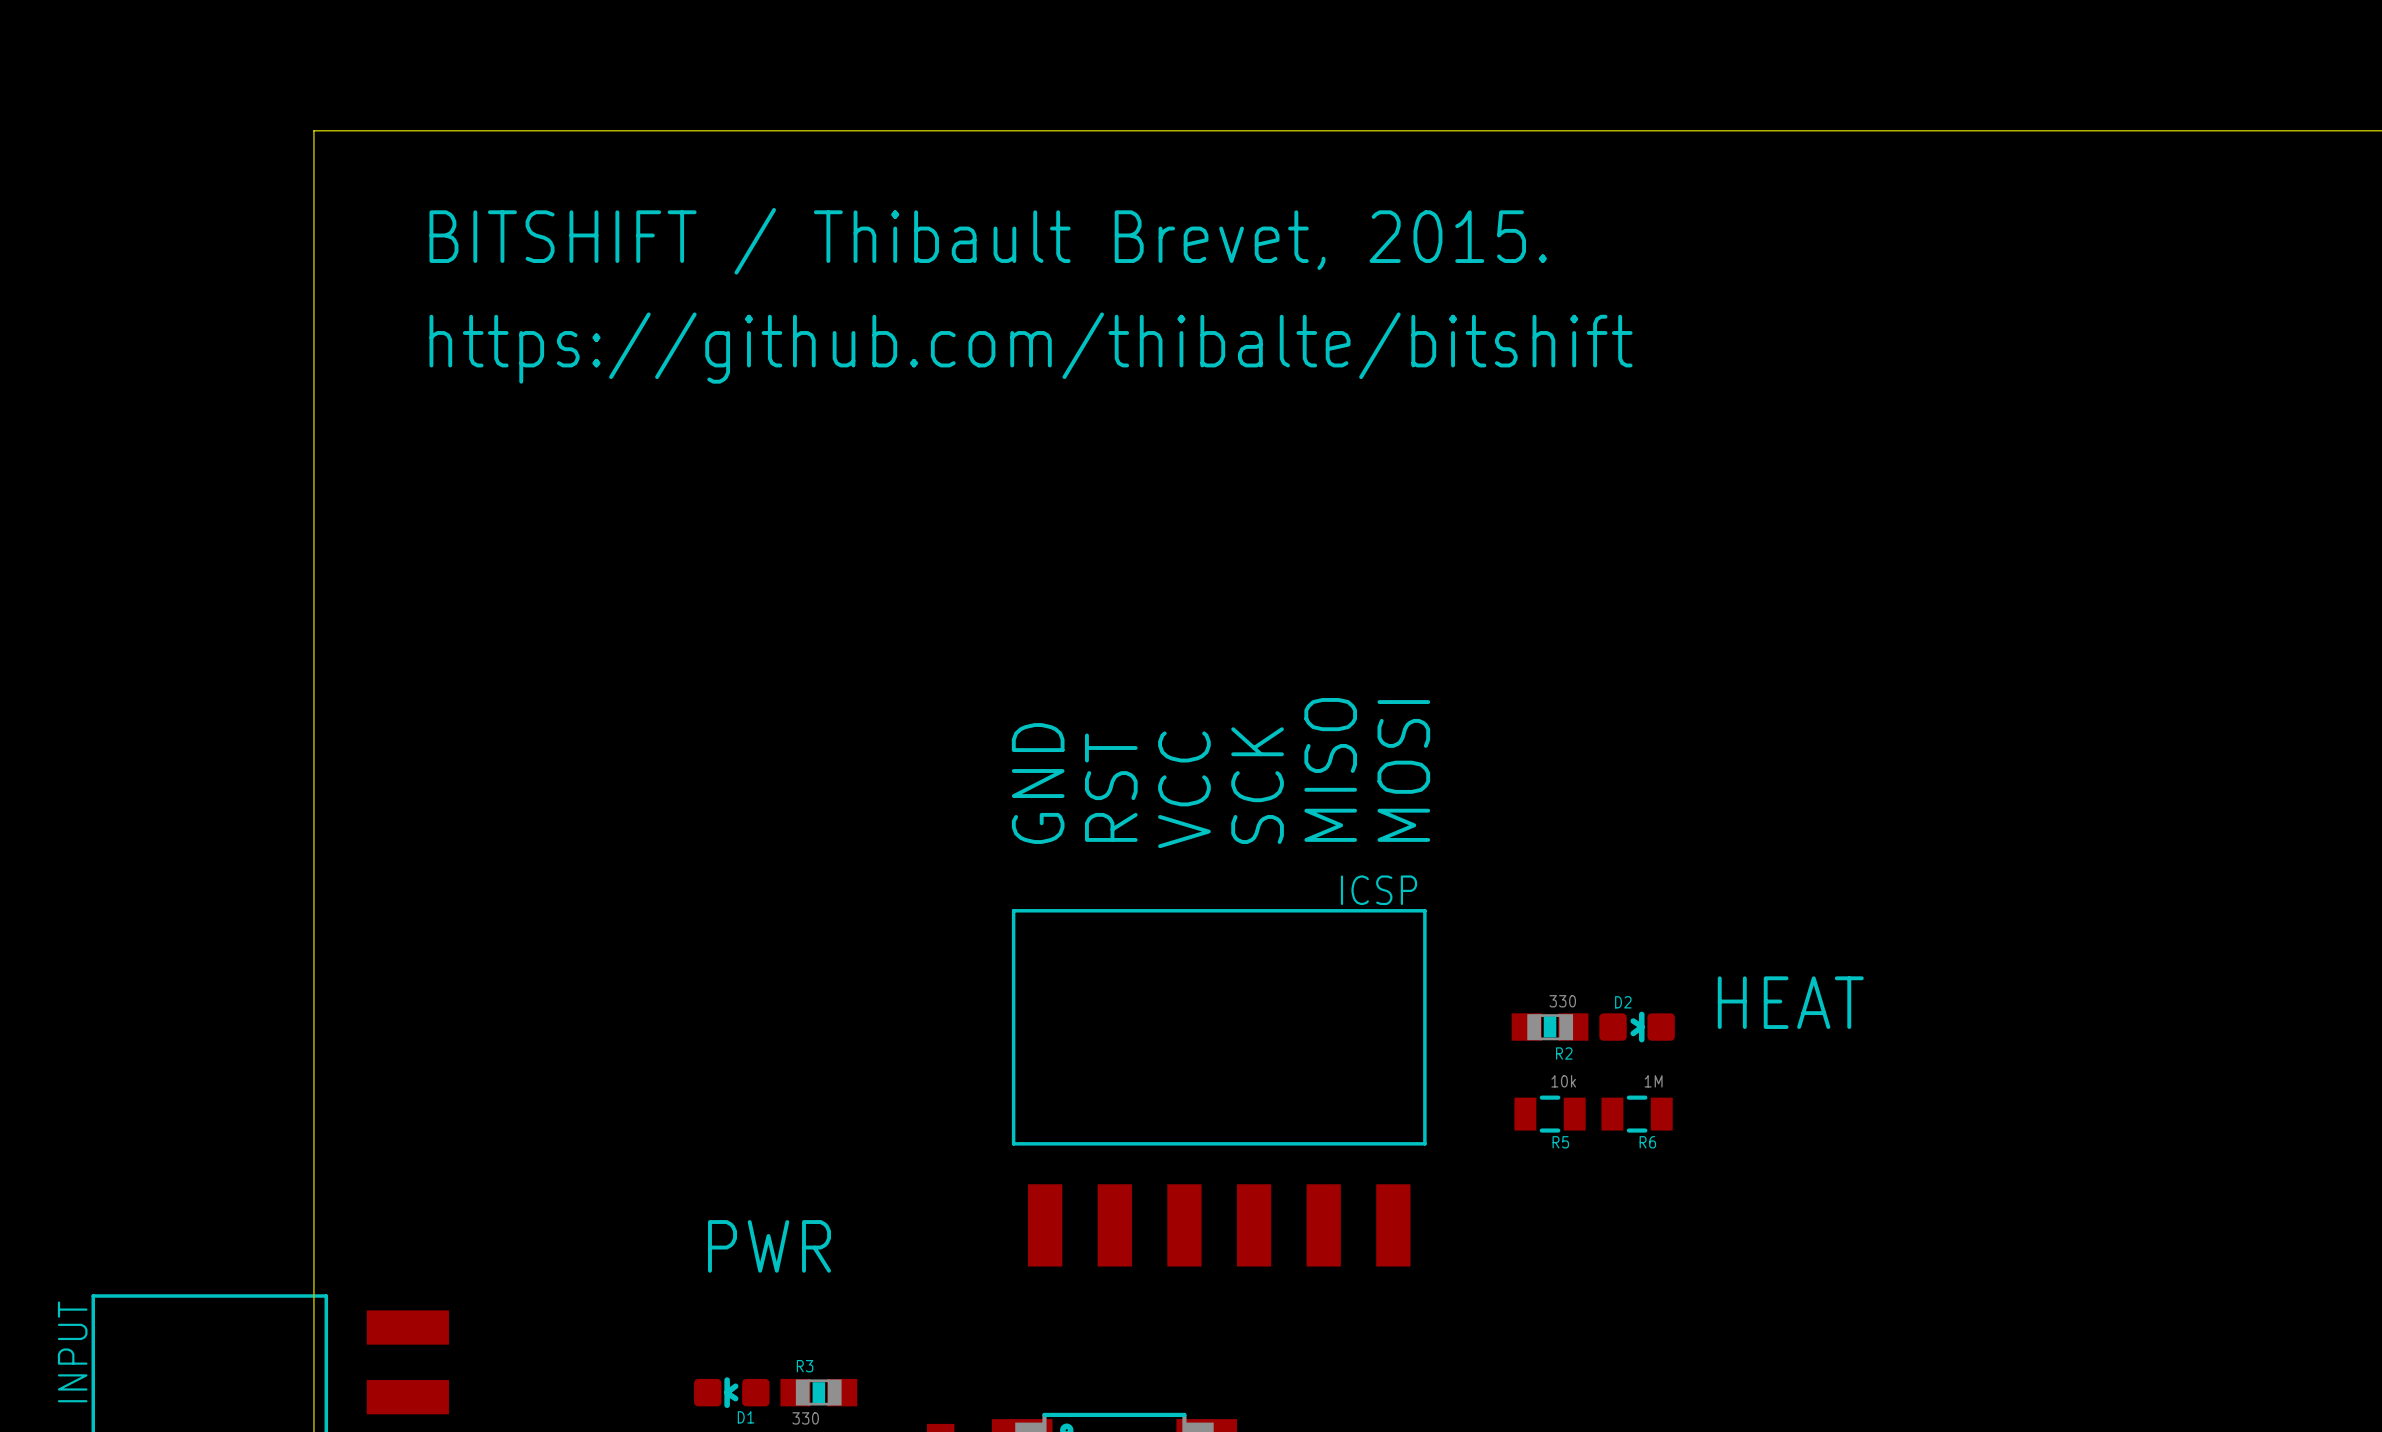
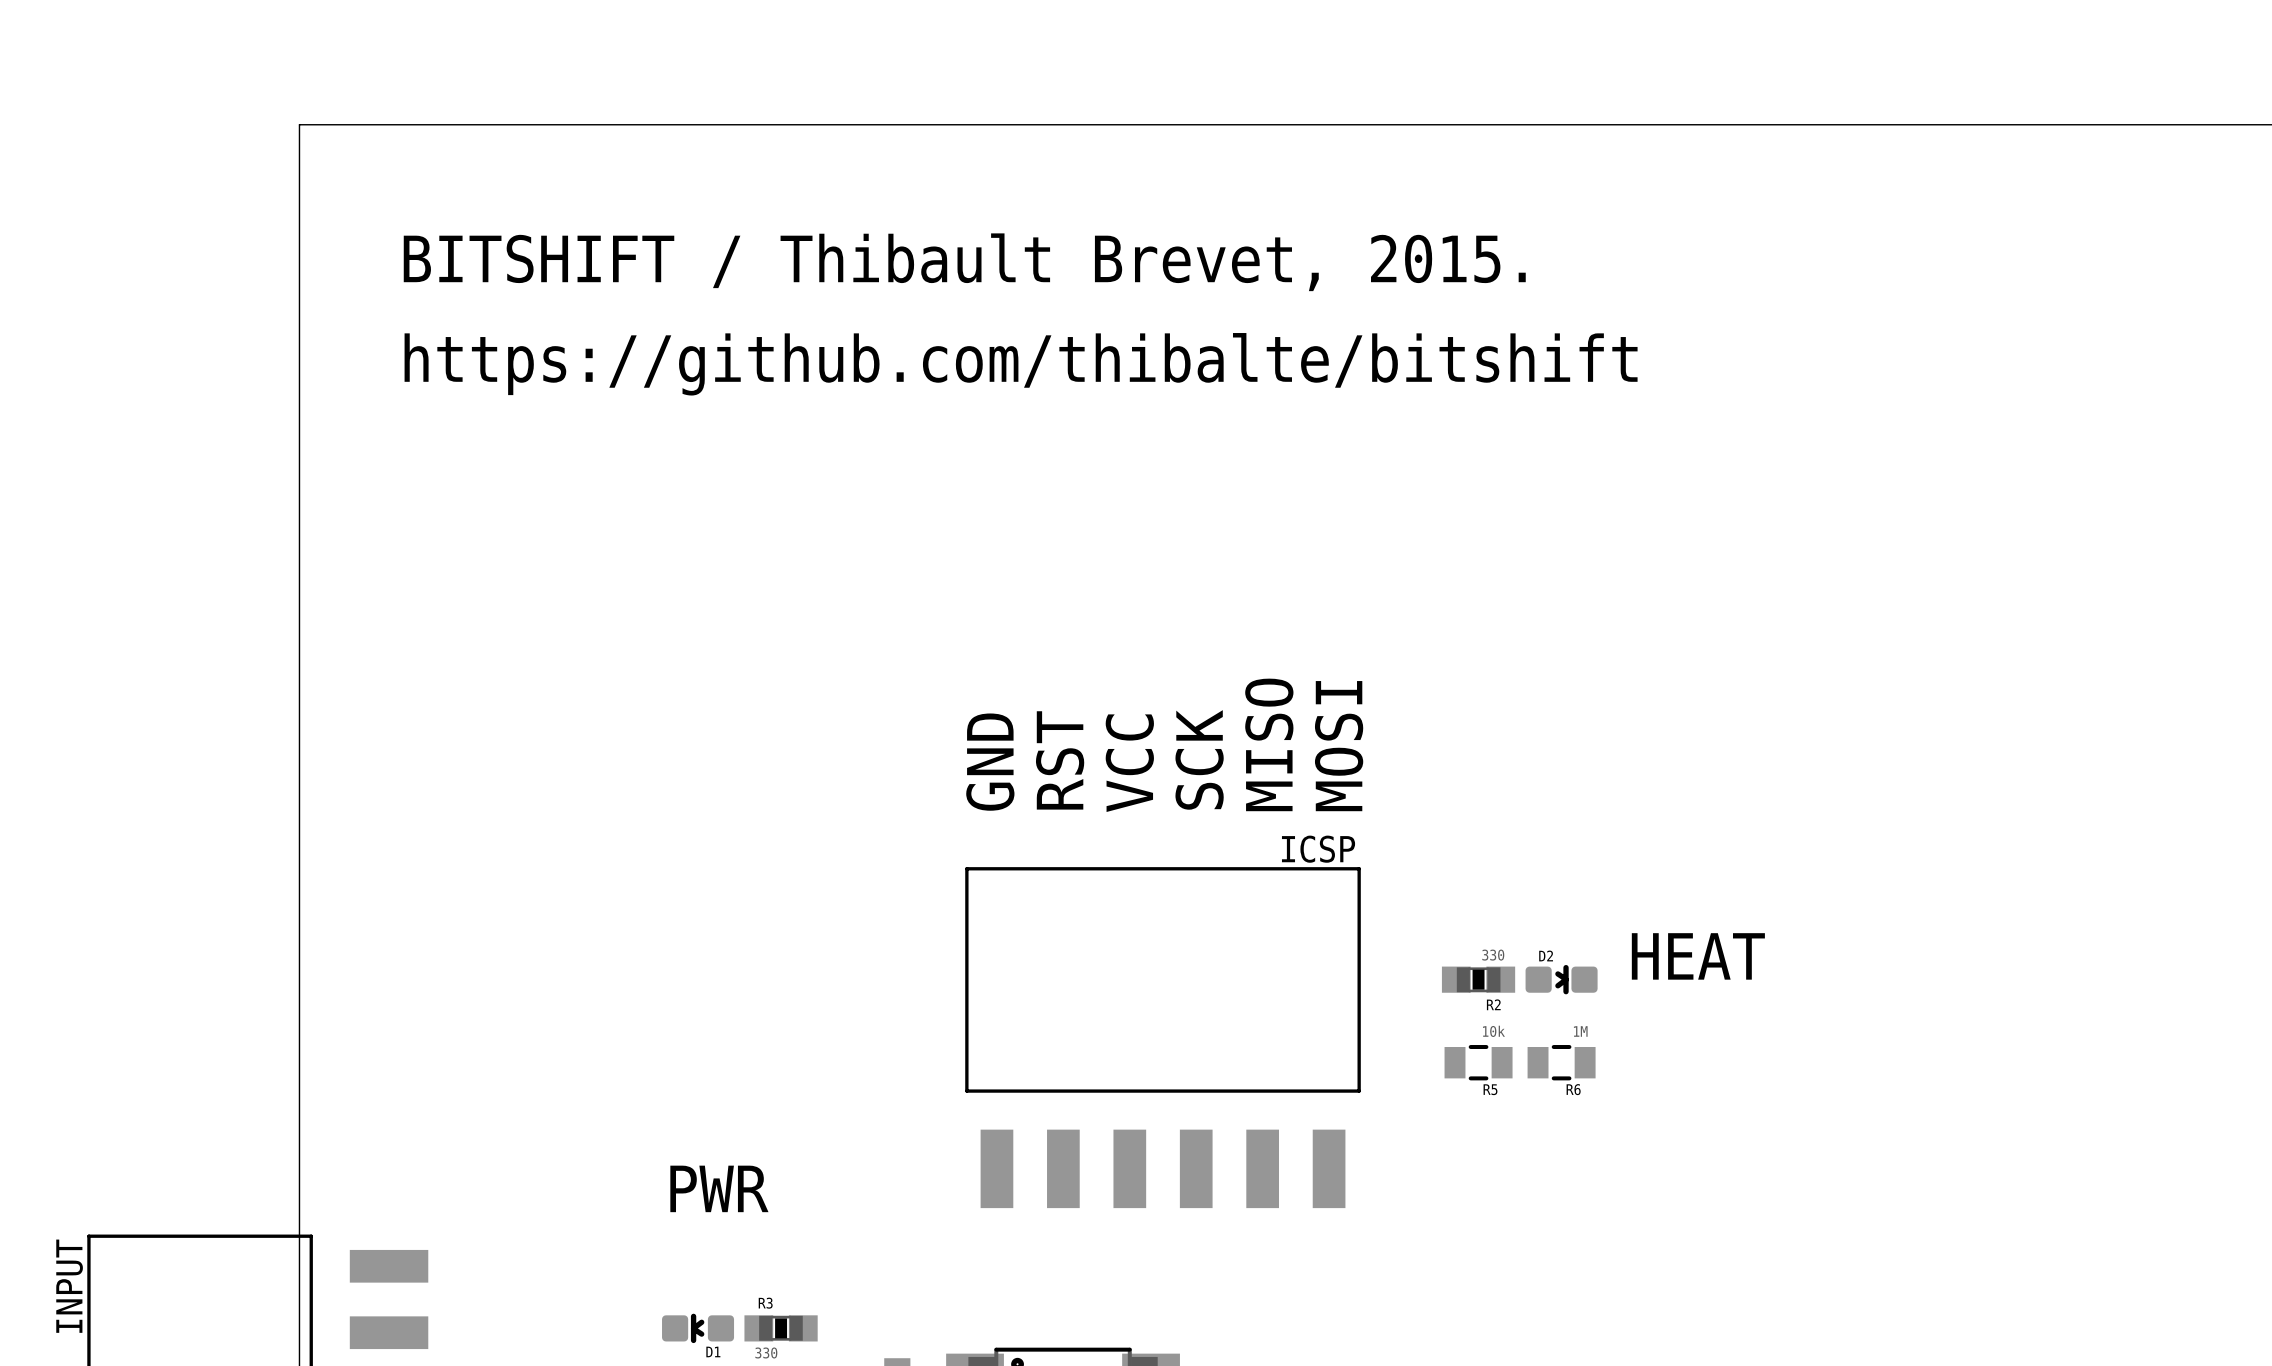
text position: BITSHIFT / Thibault Brevet, 2015. (988, 241) -> BITSHIFT / Thibault Brevet, 2015. (964, 262)
text position: https://github.com/thibalte/bitshift (1031, 348) -> https://github.com/thibalte/bitshift (1021, 364)

